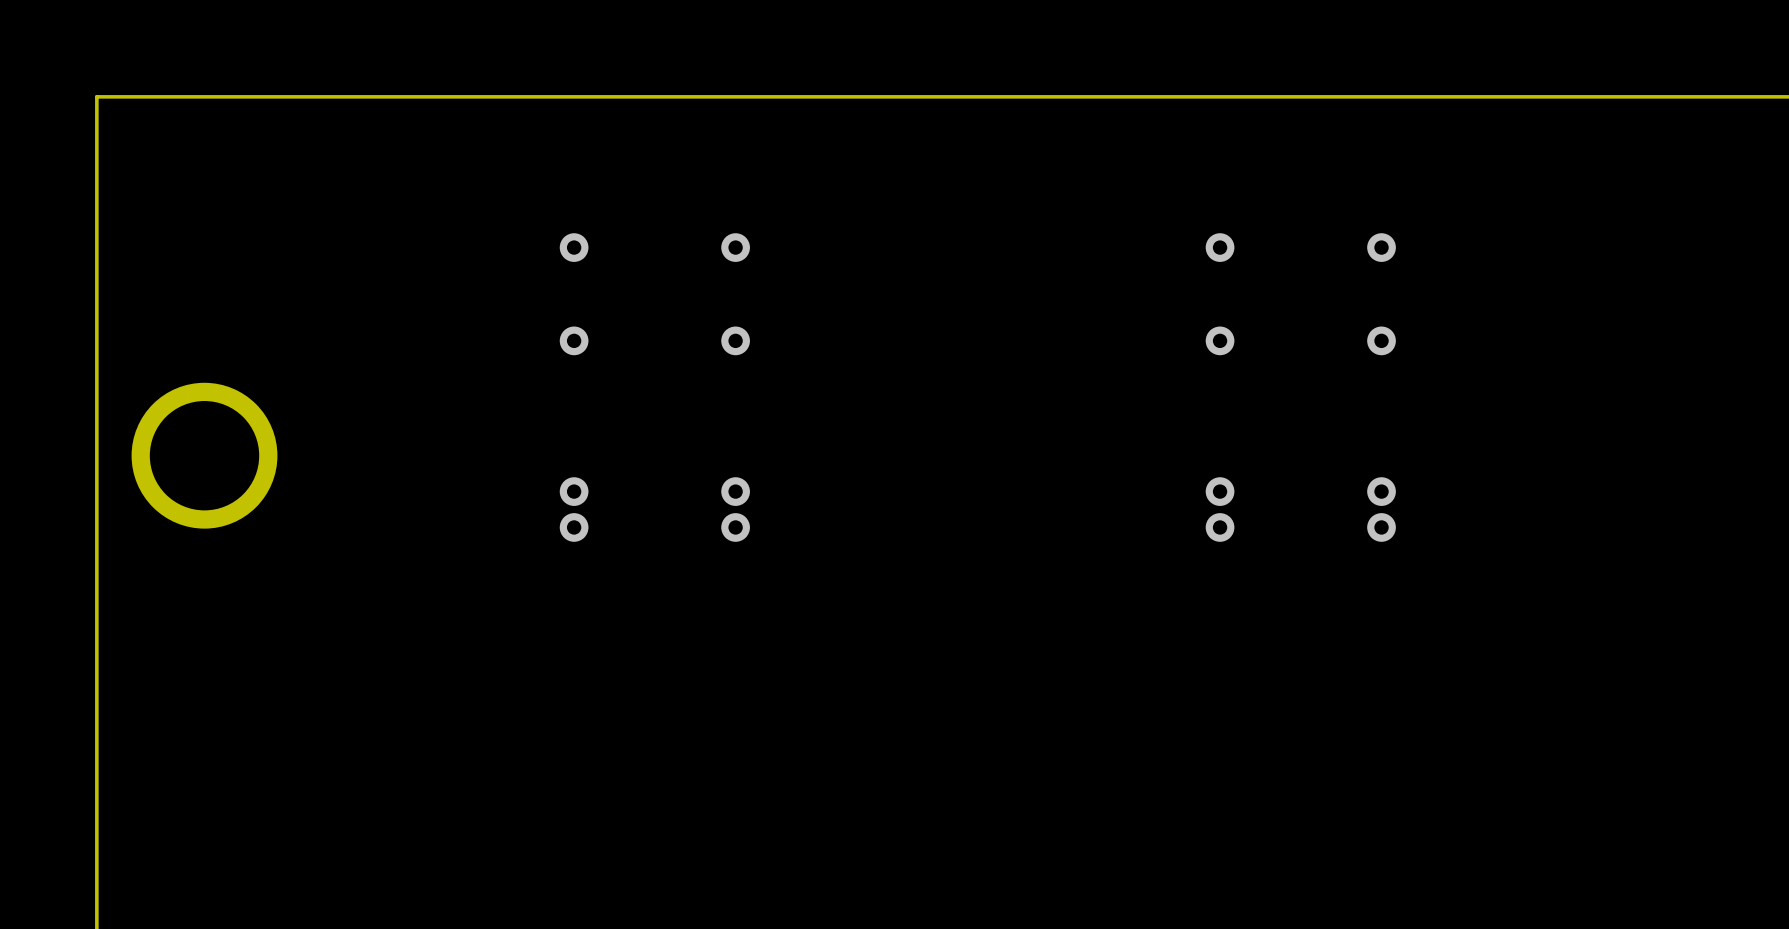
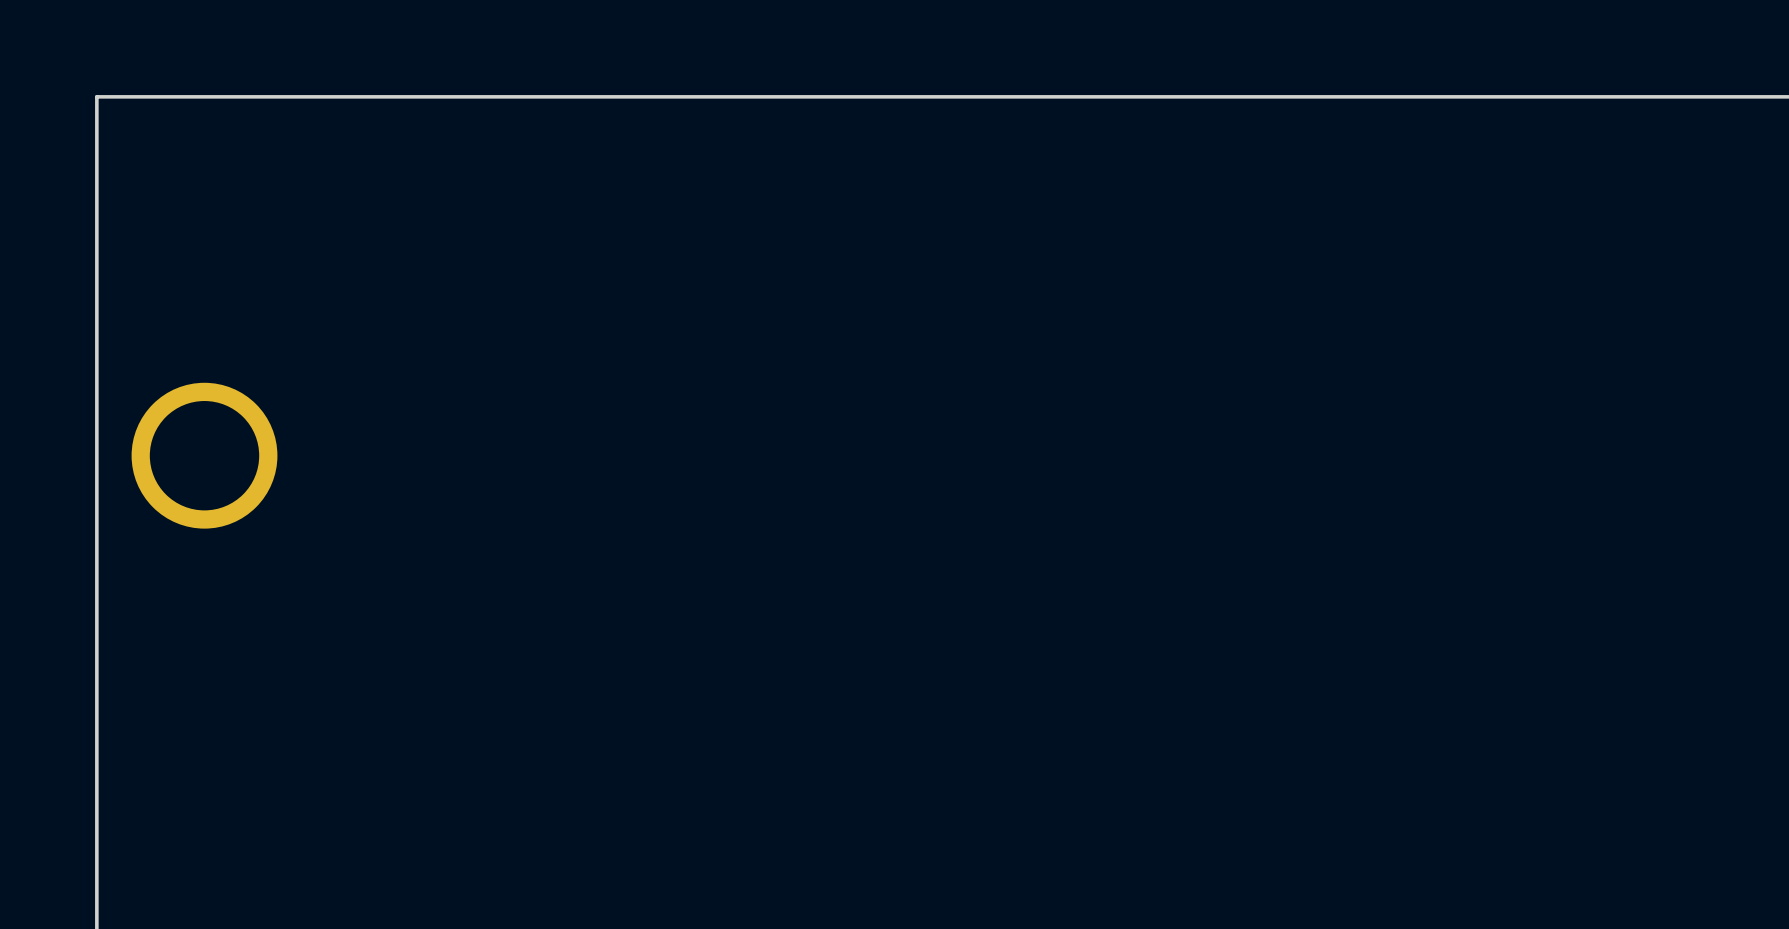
via: (574, 247) -> none
via: (735, 247) -> none
via: (1220, 247) -> none
via: (1381, 247) -> none
via: (574, 340) -> none
via: (735, 340) -> none
via: (1220, 340) -> none
via: (1381, 340) -> none
via: (574, 491) -> none
via: (735, 491) -> none
via: (1220, 491) -> none
via: (1381, 491) -> none
via: (574, 527) -> none
via: (735, 527) -> none
via: (1220, 527) -> none
via: (1381, 527) -> none

